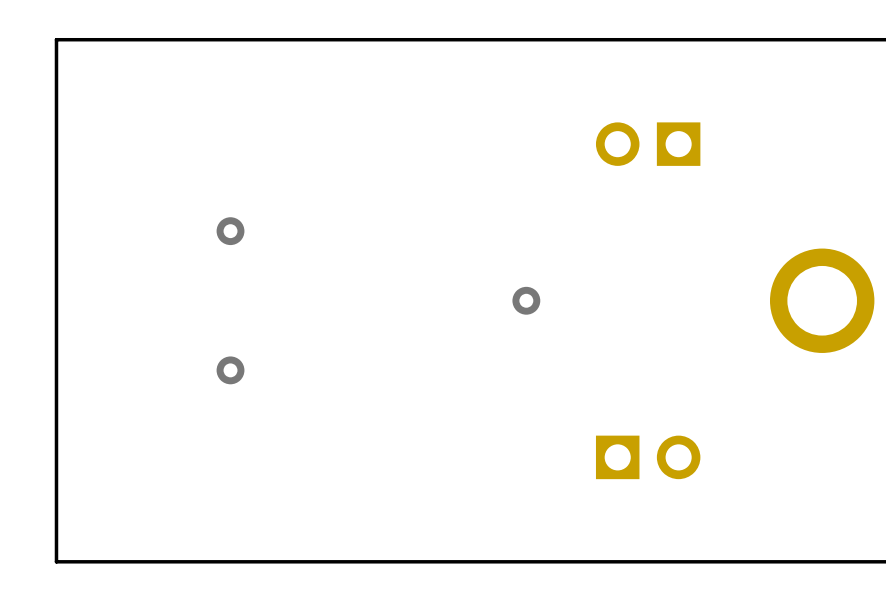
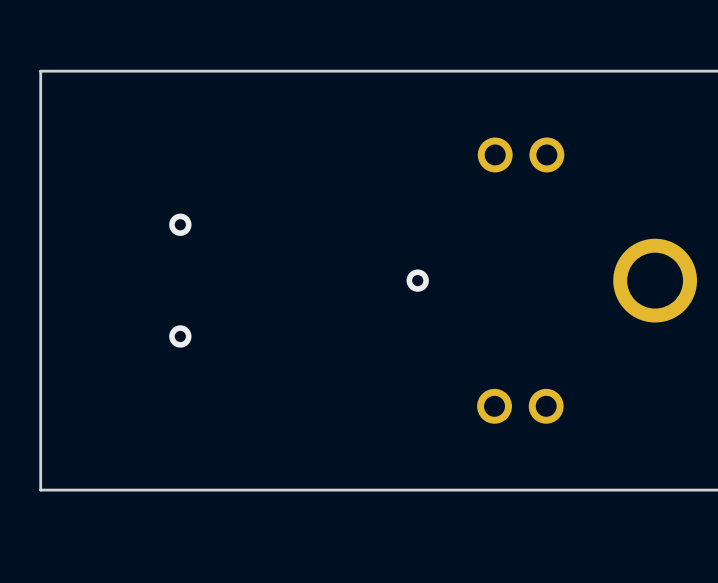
part: none -> (495, 154)
part: (648, 144) -> none
part: none -> (546, 154)
part: none -> (494, 406)
part: (648, 457) -> none
part: none -> (546, 406)

